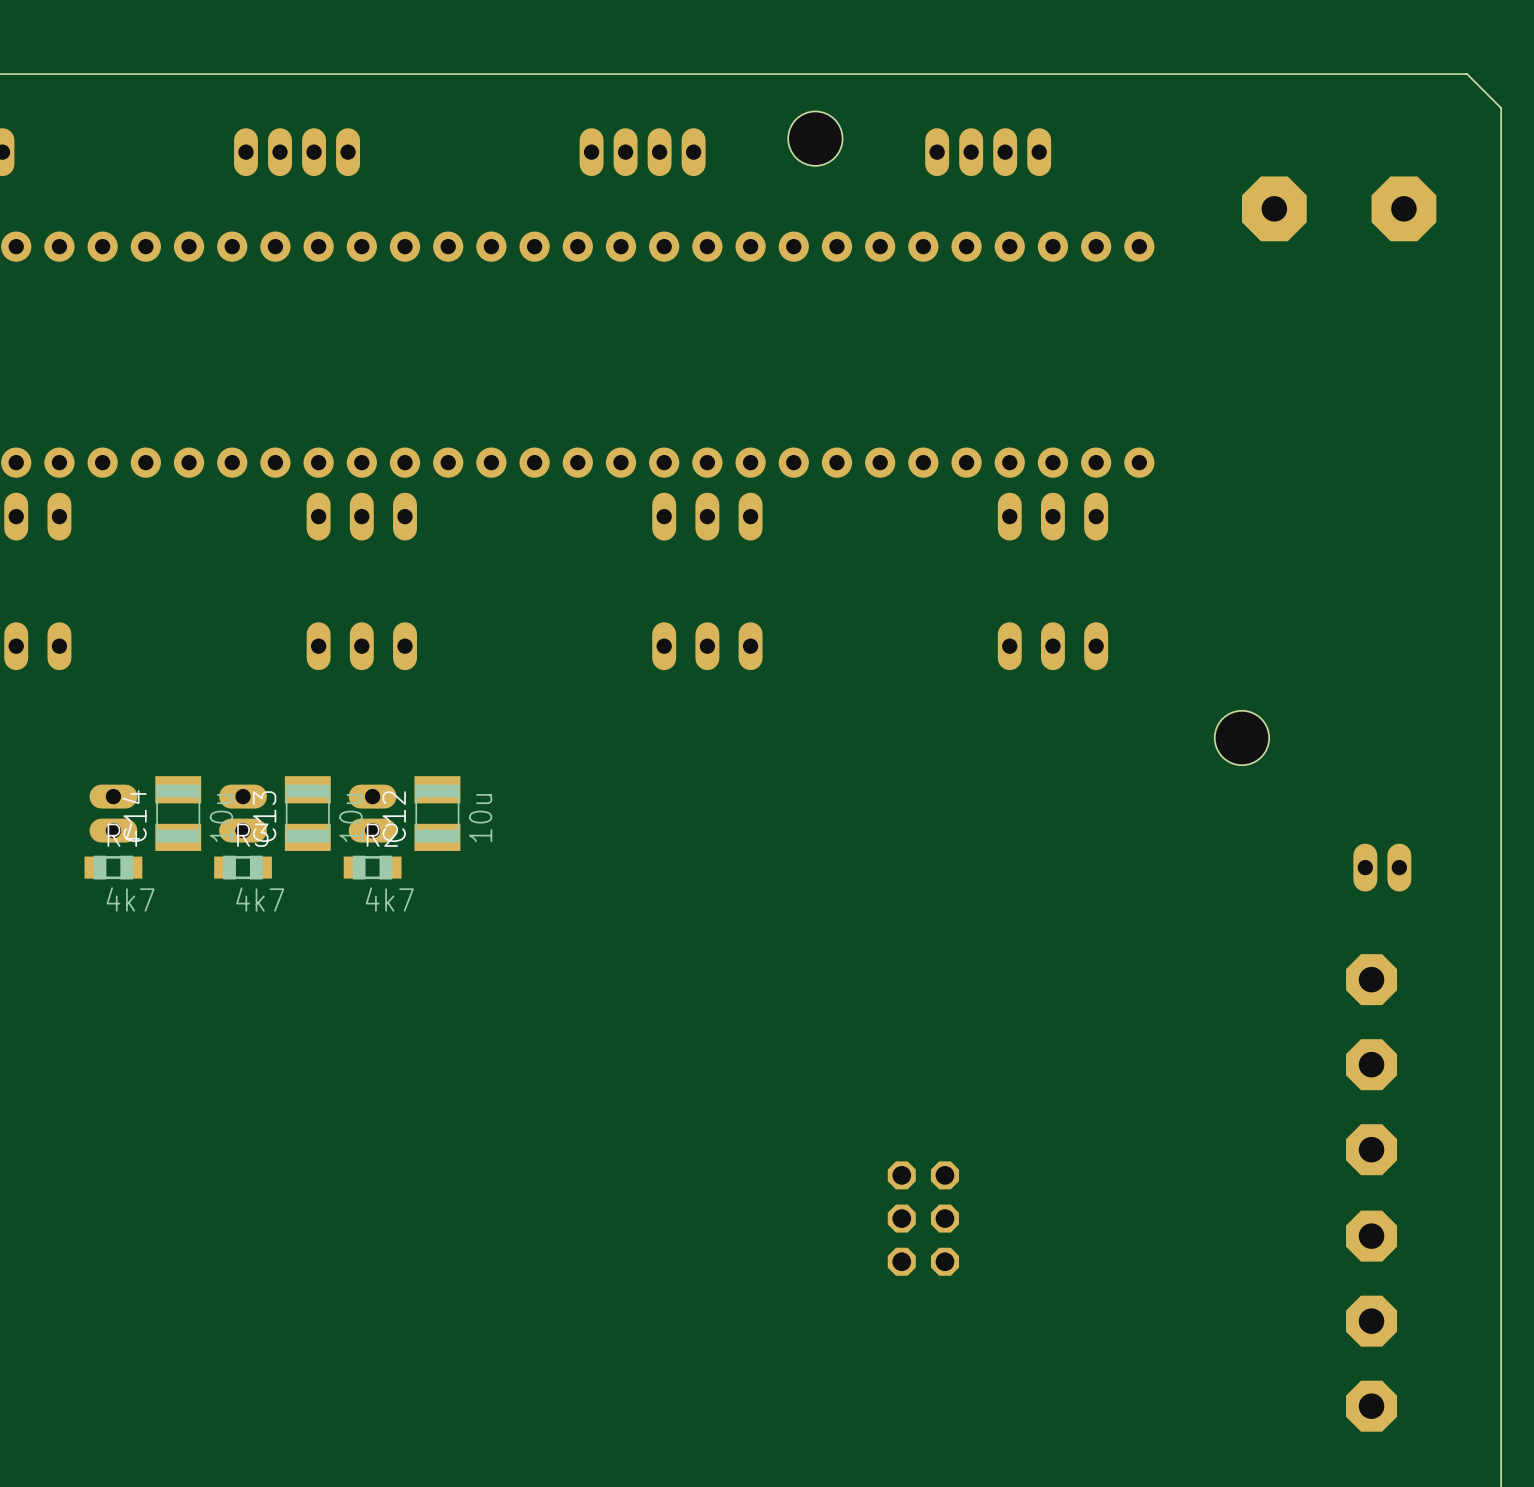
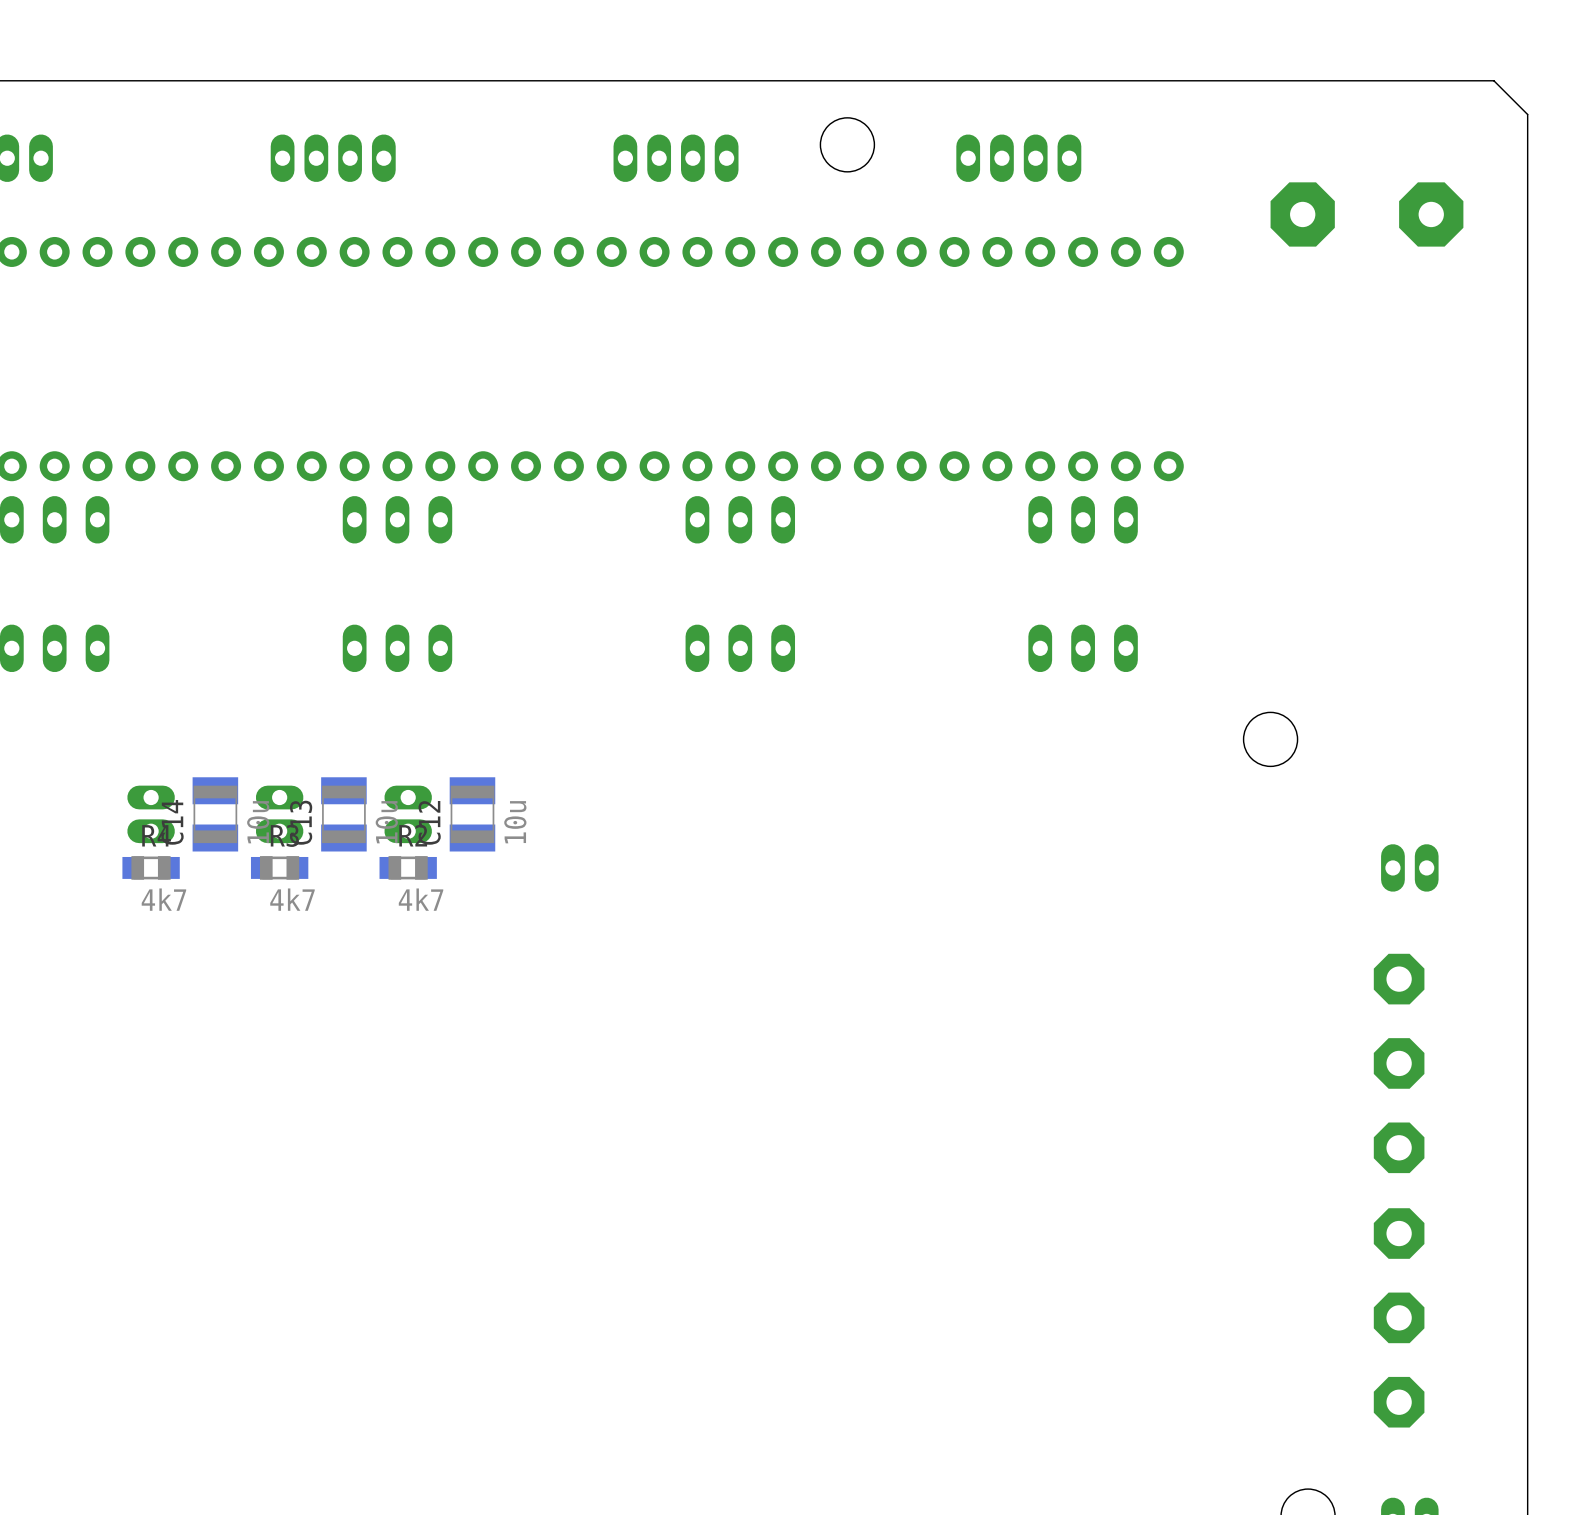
part: (923, 1218) -> none

